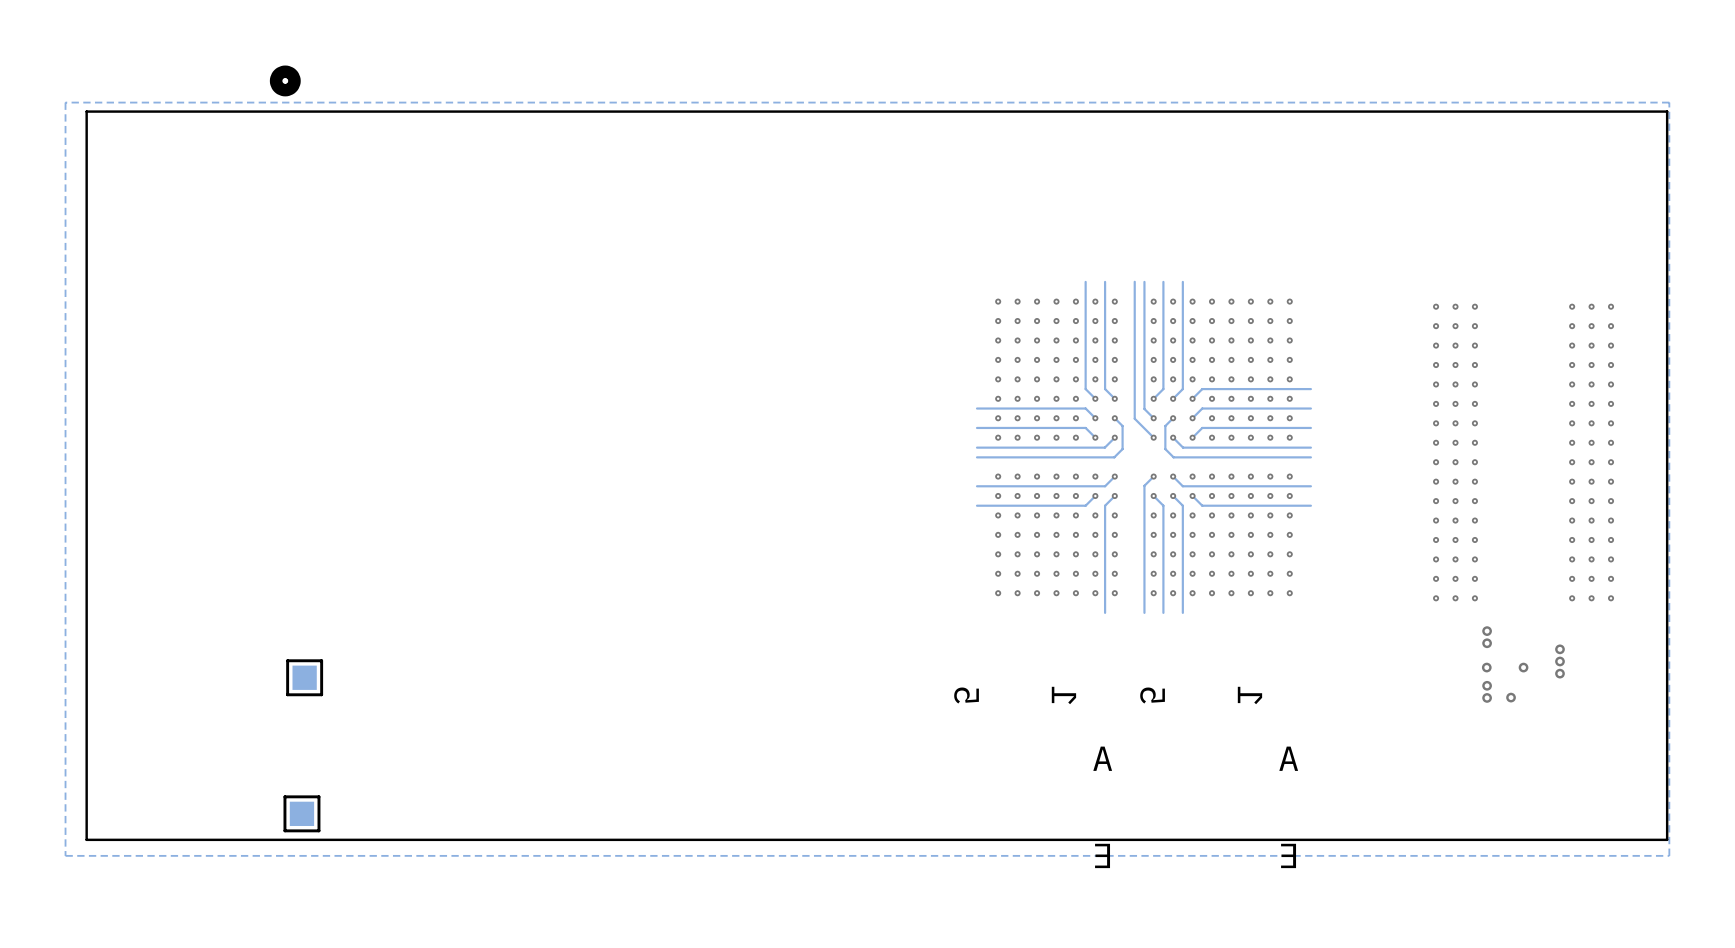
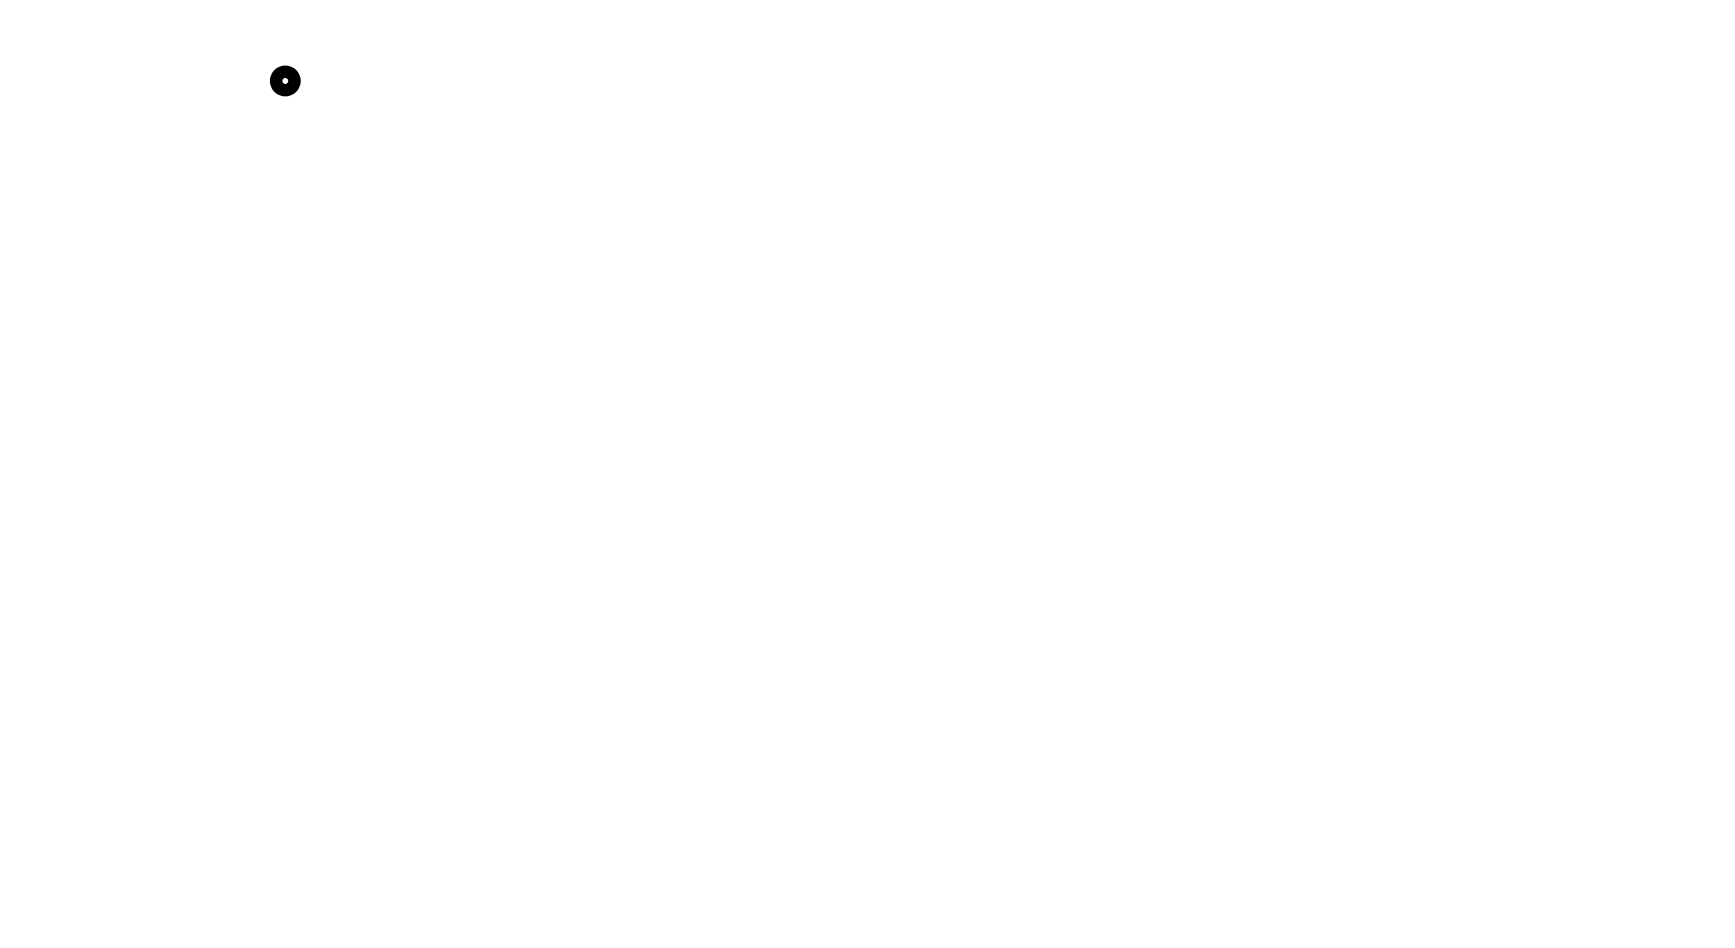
zone outline: (1669, 102) (65, 102) (65, 855) (1669, 855) (1669, 102) -> none
board edge: (1667, 111) (86, 111) (86, 839) (1667, 839) (1667, 111) -> none
track: (1085, 281) (1085, 389) (1095, 398) -> none
track: (1105, 281) (1105, 389) (1114, 398) -> none
track: (1134, 281) (1134, 418) (1153, 437) -> none
track: (1144, 281) (1144, 409) (1153, 418) -> none
track: (1163, 281) (1163, 389) (1153, 398) -> none
track: (1182, 281) (1182, 389) (1173, 398) -> none
via: (998, 301) -> none
via: (1017, 301) -> none
via: (1037, 301) -> none
via: (1056, 301) -> none
via: (1075, 301) -> none
via: (1095, 301) -> none
via: (1114, 301) -> none
via: (1153, 301) -> none
via: (1173, 301) -> none
via: (1192, 301) -> none
via: (1212, 301) -> none
via: (1231, 301) -> none
via: (1250, 301) -> none
via: (1270, 301) -> none
via: (1289, 301) -> none
via: (1436, 306) -> none
via: (1455, 306) -> none
via: (1474, 306) -> none
via: (1572, 306) -> none
via: (1591, 306) -> none
via: (1611, 306) -> none
via: (998, 321) -> none
via: (1017, 321) -> none
via: (1037, 321) -> none
via: (1056, 321) -> none
via: (1075, 321) -> none
via: (1095, 321) -> none
via: (1114, 321) -> none
via: (1153, 321) -> none
via: (1173, 321) -> none
via: (1192, 321) -> none
via: (1212, 321) -> none
via: (1231, 321) -> none
via: (1250, 321) -> none
via: (1270, 321) -> none
via: (1289, 321) -> none
via: (1436, 326) -> none
via: (1455, 326) -> none
via: (1474, 326) -> none
via: (1572, 326) -> none
via: (1591, 326) -> none
via: (1611, 326) -> none
via: (998, 340) -> none
via: (1017, 340) -> none
via: (1037, 340) -> none
via: (1056, 340) -> none
via: (1075, 340) -> none
via: (1095, 340) -> none
via: (1114, 340) -> none
via: (1153, 340) -> none
via: (1173, 340) -> none
via: (1192, 340) -> none
via: (1212, 340) -> none
via: (1231, 340) -> none
via: (1250, 340) -> none
via: (1270, 340) -> none
via: (1289, 340) -> none
via: (1436, 345) -> none
via: (1455, 345) -> none
via: (1474, 345) -> none
via: (1572, 345) -> none
via: (1591, 345) -> none
via: (1611, 345) -> none
via: (998, 359) -> none
via: (1017, 359) -> none
via: (1037, 359) -> none
via: (1056, 359) -> none
via: (1075, 359) -> none
via: (1095, 359) -> none
via: (1114, 359) -> none
via: (1153, 359) -> none
via: (1173, 359) -> none
via: (1192, 359) -> none
via: (1212, 359) -> none
via: (1231, 359) -> none
via: (1250, 359) -> none
via: (1270, 359) -> none
via: (1289, 359) -> none
via: (1436, 365) -> none
via: (1455, 365) -> none
via: (1474, 365) -> none
via: (1572, 365) -> none
via: (1591, 365) -> none
via: (1611, 365) -> none
via: (998, 379) -> none
via: (1017, 379) -> none
via: (1037, 379) -> none
via: (1056, 379) -> none
via: (1075, 379) -> none
via: (1095, 379) -> none
via: (1114, 379) -> none
via: (1153, 379) -> none
via: (1173, 379) -> none
via: (1192, 379) -> none
via: (1212, 379) -> none
via: (1231, 379) -> none
via: (1250, 379) -> none
via: (1270, 379) -> none
via: (1289, 379) -> none
via: (1436, 384) -> none
via: (1455, 384) -> none
via: (1474, 384) -> none
via: (1572, 384) -> none
via: (1591, 384) -> none
via: (1611, 384) -> none
track: (1310, 389) (1202, 389) (1192, 398) -> none
via: (998, 398) -> none
via: (1017, 398) -> none
via: (1037, 398) -> none
via: (1056, 398) -> none
via: (1075, 398) -> none
via: (1095, 398) -> none
via: (1114, 398) -> none
via: (1153, 398) -> none
via: (1173, 398) -> none
via: (1192, 398) -> none
via: (1212, 398) -> none
via: (1231, 398) -> none
via: (1250, 398) -> none
via: (1270, 398) -> none
via: (1289, 398) -> none
via: (1436, 403) -> none
via: (1455, 403) -> none
via: (1474, 403) -> none
via: (1572, 403) -> none
via: (1591, 403) -> none
via: (1611, 403) -> none
track: (977, 408) (1085, 408) (1095, 418) -> none
track: (1310, 408) (1202, 408) (1192, 418) -> none
via: (998, 418) -> none
via: (1017, 418) -> none
via: (1037, 418) -> none
via: (1056, 418) -> none
via: (1075, 418) -> none
via: (1095, 418) -> none
track: (1114, 418) (1122, 426) (1122, 449) (1114, 457) (977, 457) -> none
via: (1114, 418) -> none
via: (1153, 418) -> none
track: (1173, 418) (1165, 426) (1165, 449) (1173, 457) (1310, 457) -> none
via: (1173, 418) -> none
via: (1192, 418) -> none
via: (1212, 418) -> none
via: (1231, 418) -> none
via: (1250, 418) -> none
via: (1270, 418) -> none
via: (1289, 418) -> none
via: (1436, 423) -> none
via: (1455, 423) -> none
via: (1474, 423) -> none
via: (1572, 423) -> none
via: (1591, 423) -> none
via: (1611, 423) -> none
track: (977, 427) (1085, 427) (1095, 437) -> none
track: (1310, 427) (1202, 427) (1192, 437) -> none
via: (998, 437) -> none
via: (1017, 437) -> none
via: (1037, 437) -> none
via: (1056, 437) -> none
via: (1075, 437) -> none
via: (1095, 437) -> none
track: (1114, 437) (1104, 447) (977, 447) -> none
via: (1114, 437) -> none
via: (1153, 437) -> none
track: (1173, 437) (1183, 447) (1310, 447) -> none
via: (1173, 437) -> none
via: (1192, 437) -> none
via: (1212, 437) -> none
via: (1231, 437) -> none
via: (1250, 437) -> none
via: (1270, 437) -> none
via: (1289, 437) -> none
via: (1436, 442) -> none
via: (1455, 442) -> none
via: (1474, 442) -> none
via: (1572, 442) -> none
via: (1591, 442) -> none
via: (1611, 442) -> none
via: (1436, 462) -> none
via: (1455, 462) -> none
via: (1474, 462) -> none
via: (1572, 462) -> none
via: (1591, 462) -> none
via: (1611, 462) -> none
via: (998, 476) -> none
via: (1017, 476) -> none
via: (1037, 476) -> none
via: (1056, 476) -> none
via: (1075, 476) -> none
via: (1095, 476) -> none
track: (1114, 476) (1105, 486) (977, 486) -> none
via: (1114, 476) -> none
track: (1153, 476) (1144, 485) (1144, 612) -> none
via: (1153, 476) -> none
track: (1173, 476) (1182, 486) (1310, 486) -> none
via: (1173, 476) -> none
via: (1192, 476) -> none
via: (1212, 476) -> none
via: (1231, 476) -> none
via: (1250, 476) -> none
via: (1270, 476) -> none
via: (1289, 476) -> none
via: (1436, 481) -> none
via: (1455, 481) -> none
via: (1474, 481) -> none
via: (1572, 481) -> none
via: (1591, 481) -> none
via: (1611, 481) -> none
via: (998, 496) -> none
via: (1017, 496) -> none
via: (1037, 496) -> none
via: (1056, 496) -> none
via: (1075, 496) -> none
track: (1095, 496) (1085, 505) (977, 505) -> none
via: (1095, 496) -> none
track: (1114, 496) (1105, 505) (1105, 612) -> none
via: (1114, 496) -> none
track: (1153, 496) (1163, 505) (1163, 612) -> none
via: (1153, 496) -> none
track: (1173, 496) (1182, 505) (1182, 612) -> none
via: (1173, 496) -> none
track: (1192, 496) (1202, 505) (1310, 505) -> none
via: (1192, 496) -> none
via: (1212, 496) -> none
via: (1231, 496) -> none
via: (1250, 496) -> none
via: (1270, 496) -> none
via: (1289, 496) -> none
via: (1436, 501) -> none
via: (1455, 501) -> none
via: (1474, 501) -> none
via: (1572, 501) -> none
via: (1591, 501) -> none
via: (1611, 501) -> none
via: (998, 515) -> none
via: (1017, 515) -> none
via: (1037, 515) -> none
via: (1056, 515) -> none
via: (1075, 515) -> none
via: (1095, 515) -> none
via: (1114, 515) -> none
via: (1153, 515) -> none
via: (1173, 515) -> none
via: (1192, 515) -> none
via: (1212, 515) -> none
via: (1231, 515) -> none
via: (1250, 515) -> none
via: (1270, 515) -> none
via: (1289, 515) -> none
via: (1436, 520) -> none
via: (1455, 520) -> none
via: (1474, 520) -> none
via: (1572, 520) -> none
via: (1591, 520) -> none
via: (1611, 520) -> none
via: (998, 534) -> none
via: (1017, 534) -> none
via: (1037, 534) -> none
via: (1056, 534) -> none
via: (1075, 534) -> none
via: (1095, 534) -> none
via: (1114, 534) -> none
via: (1153, 534) -> none
via: (1173, 534) -> none
via: (1192, 534) -> none
via: (1212, 534) -> none
via: (1231, 534) -> none
via: (1250, 534) -> none
via: (1270, 534) -> none
via: (1289, 534) -> none
via: (1436, 539) -> none
via: (1455, 539) -> none
via: (1474, 539) -> none
via: (1572, 539) -> none
via: (1591, 539) -> none
via: (1611, 539) -> none
via: (998, 554) -> none
via: (1017, 554) -> none
via: (1037, 554) -> none
via: (1056, 554) -> none
via: (1075, 554) -> none
via: (1095, 554) -> none
via: (1114, 554) -> none
via: (1153, 554) -> none
via: (1173, 554) -> none
via: (1192, 554) -> none
via: (1212, 554) -> none
via: (1231, 554) -> none
via: (1250, 554) -> none
via: (1270, 554) -> none
via: (1289, 554) -> none
via: (1436, 559) -> none
via: (1455, 559) -> none
via: (1474, 559) -> none
via: (1572, 559) -> none
via: (1591, 559) -> none
via: (1611, 559) -> none
via: (998, 573) -> none
via: (1017, 573) -> none
via: (1037, 573) -> none
via: (1056, 573) -> none
via: (1075, 573) -> none
via: (1095, 573) -> none
via: (1114, 573) -> none
via: (1153, 573) -> none
via: (1173, 573) -> none
via: (1192, 573) -> none
via: (1212, 573) -> none
via: (1231, 573) -> none
via: (1250, 573) -> none
via: (1270, 573) -> none
via: (1289, 573) -> none
via: (1436, 578) -> none
via: (1455, 578) -> none
via: (1474, 578) -> none
via: (1572, 578) -> none
via: (1591, 578) -> none
via: (1611, 578) -> none
via: (998, 593) -> none
via: (1017, 593) -> none
via: (1037, 593) -> none
via: (1056, 593) -> none
via: (1075, 593) -> none
via: (1095, 593) -> none
via: (1114, 593) -> none
via: (1153, 593) -> none
via: (1173, 593) -> none
via: (1192, 593) -> none
via: (1212, 593) -> none
via: (1231, 593) -> none
via: (1250, 593) -> none
via: (1270, 593) -> none
via: (1289, 593) -> none
via: (1436, 598) -> none
via: (1455, 598) -> none
via: (1474, 598) -> none
via: (1572, 598) -> none
via: (1591, 598) -> none
via: (1611, 598) -> none
via: (1487, 631) -> none
via: (1487, 643) -> none
via: (1559, 649) -> none
via: (1559, 661) -> none
via: (1486, 667) -> none
via: (1523, 667) -> none
via: (1559, 673) -> none
part: (304, 677) -> none
via: (1487, 685) -> none
via: (1487, 697) -> none
via: (1511, 697) -> none
part: (1033, 777) -> none
part: (1219, 777) -> none
part: (301, 813) -> none

